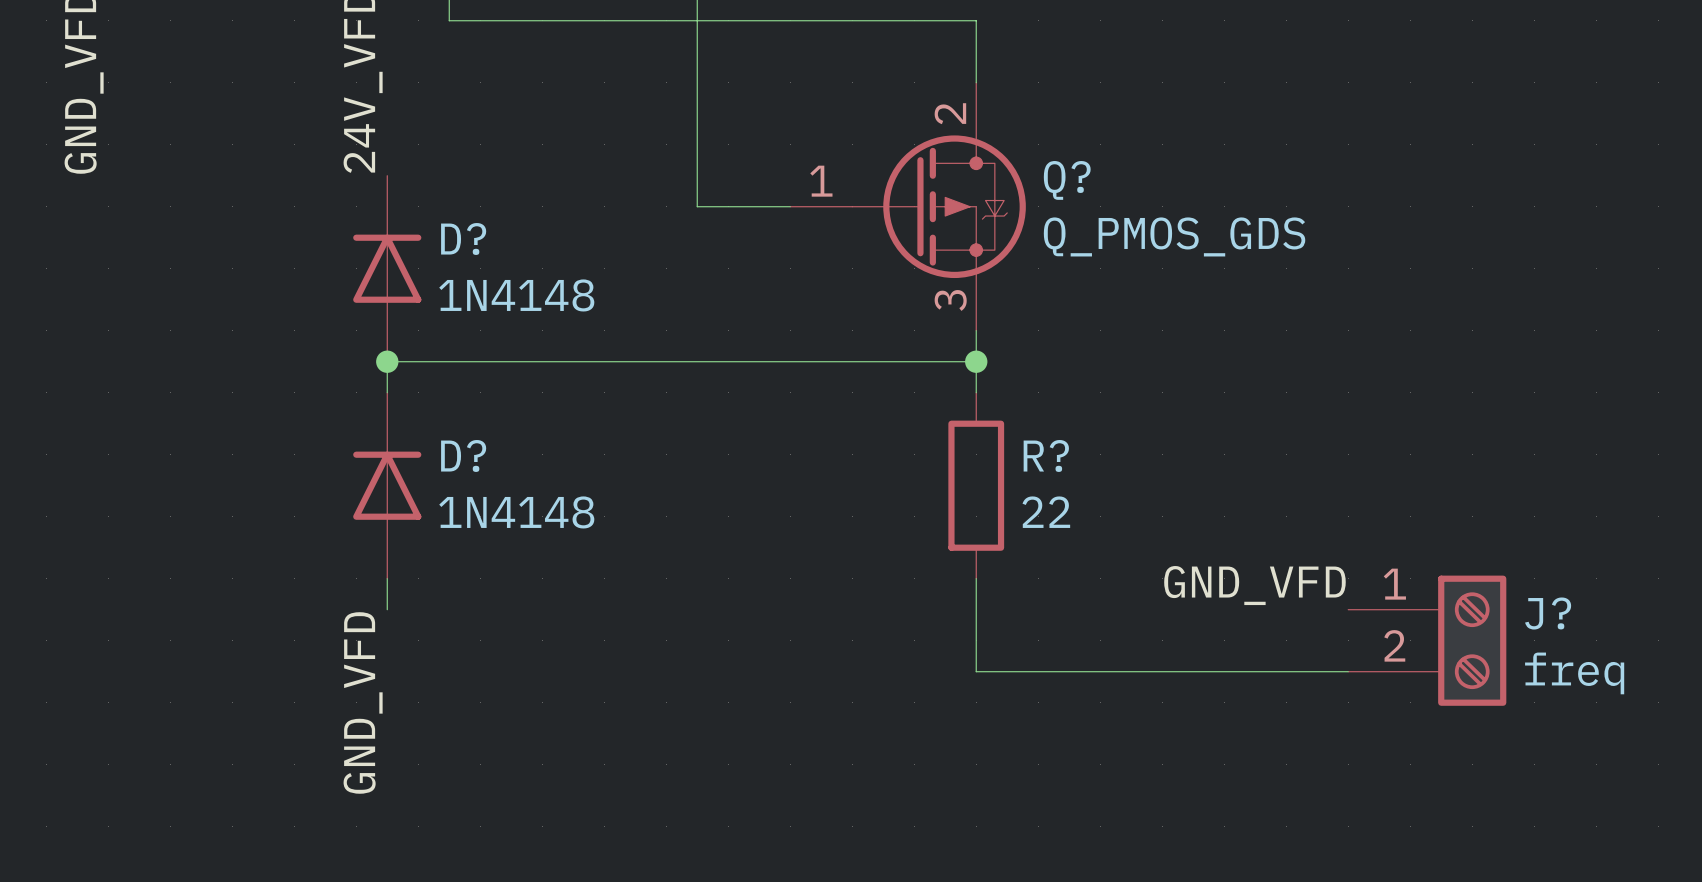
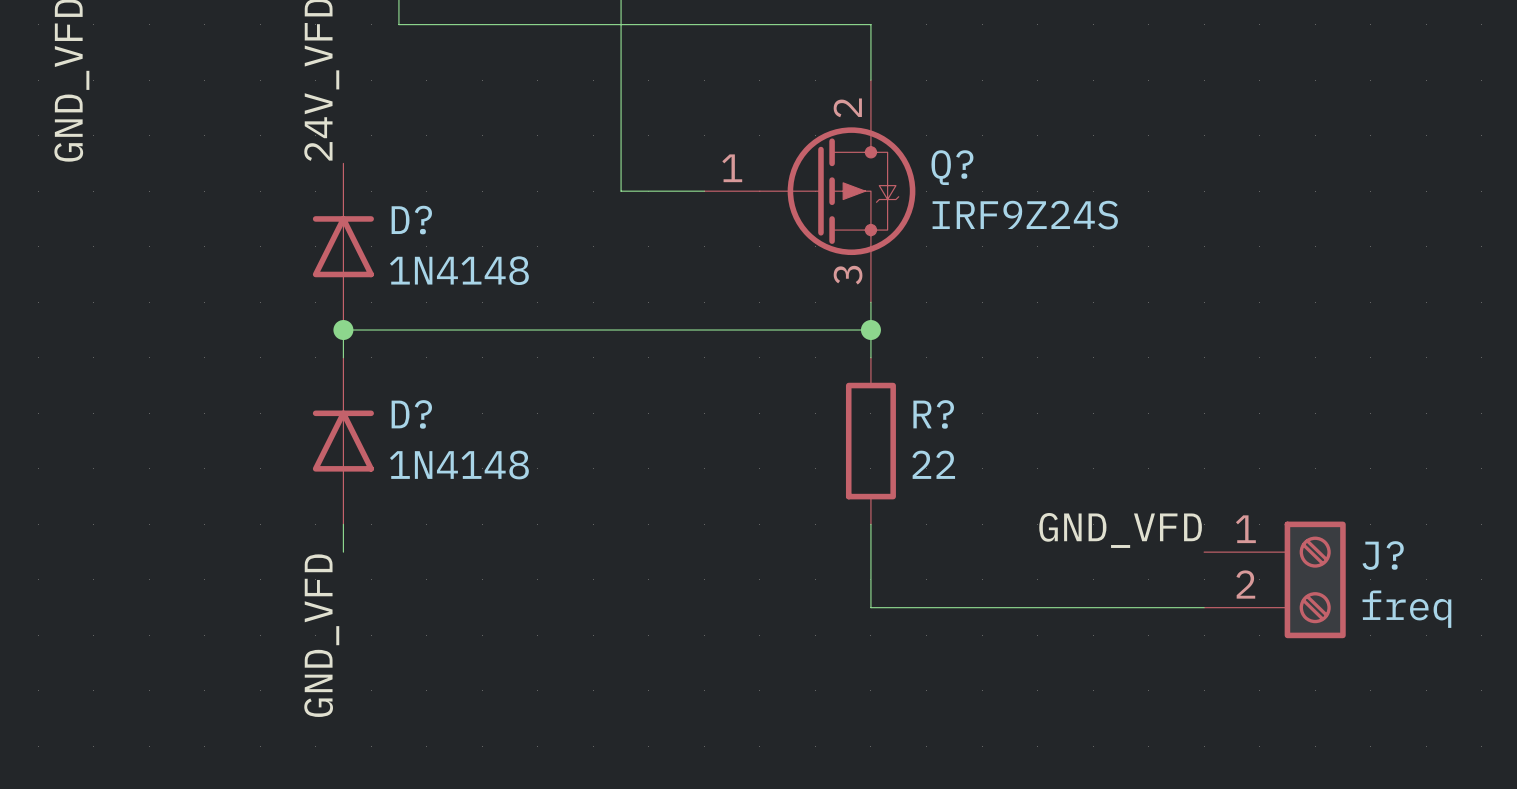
Q? value: Q_PMOS_GDS (1174, 236) -> IRF9Z24S (1025, 215)

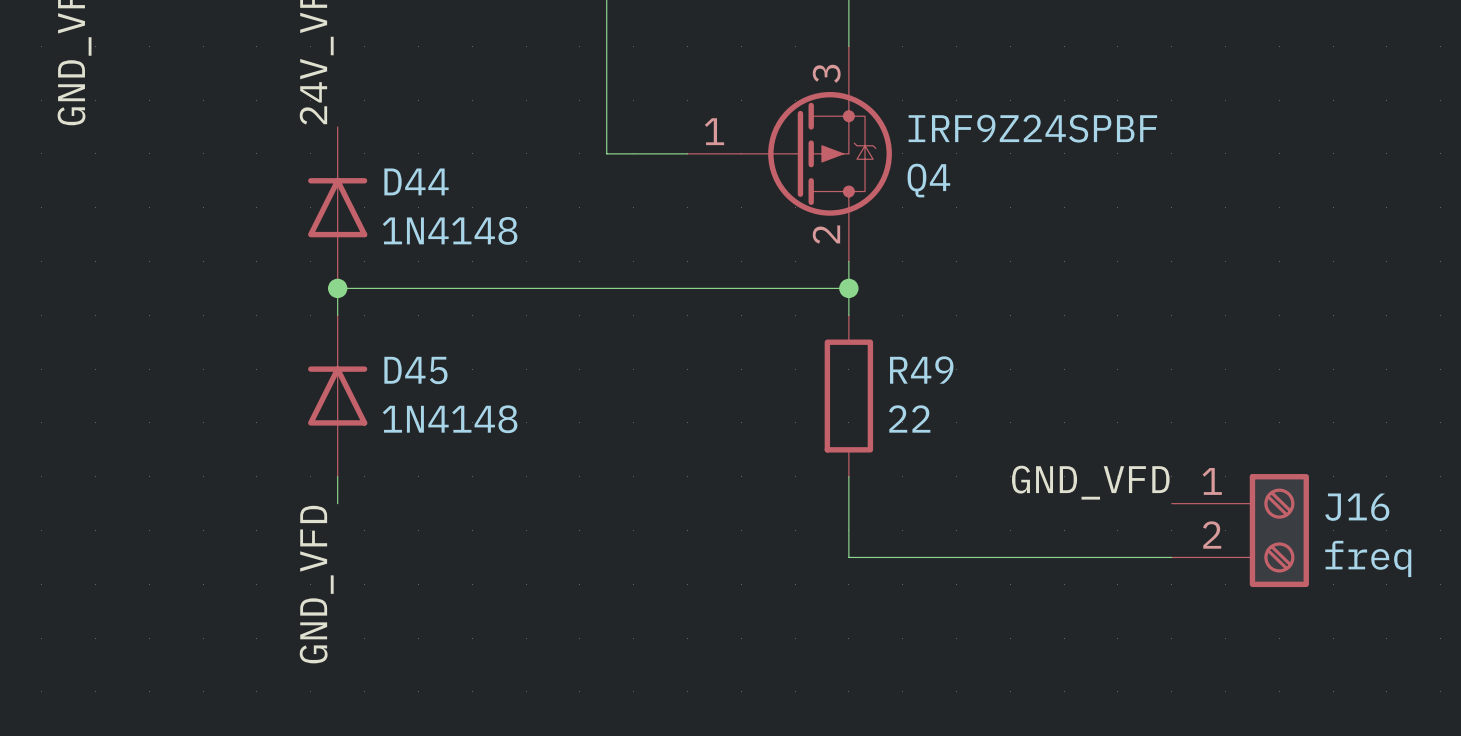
Q?: IRF9Z24S (809, 191) -> none
Q4: none -> IRF9Z24SPBF (789, 153)
D? name: D? (411, 220) -> D44 (416, 181)
D? name: D? (411, 414) -> D45 (415, 370)
R? name: R? (933, 414) -> R49 (921, 370)
J? name: J? (1383, 555) -> J16 (1357, 507)

